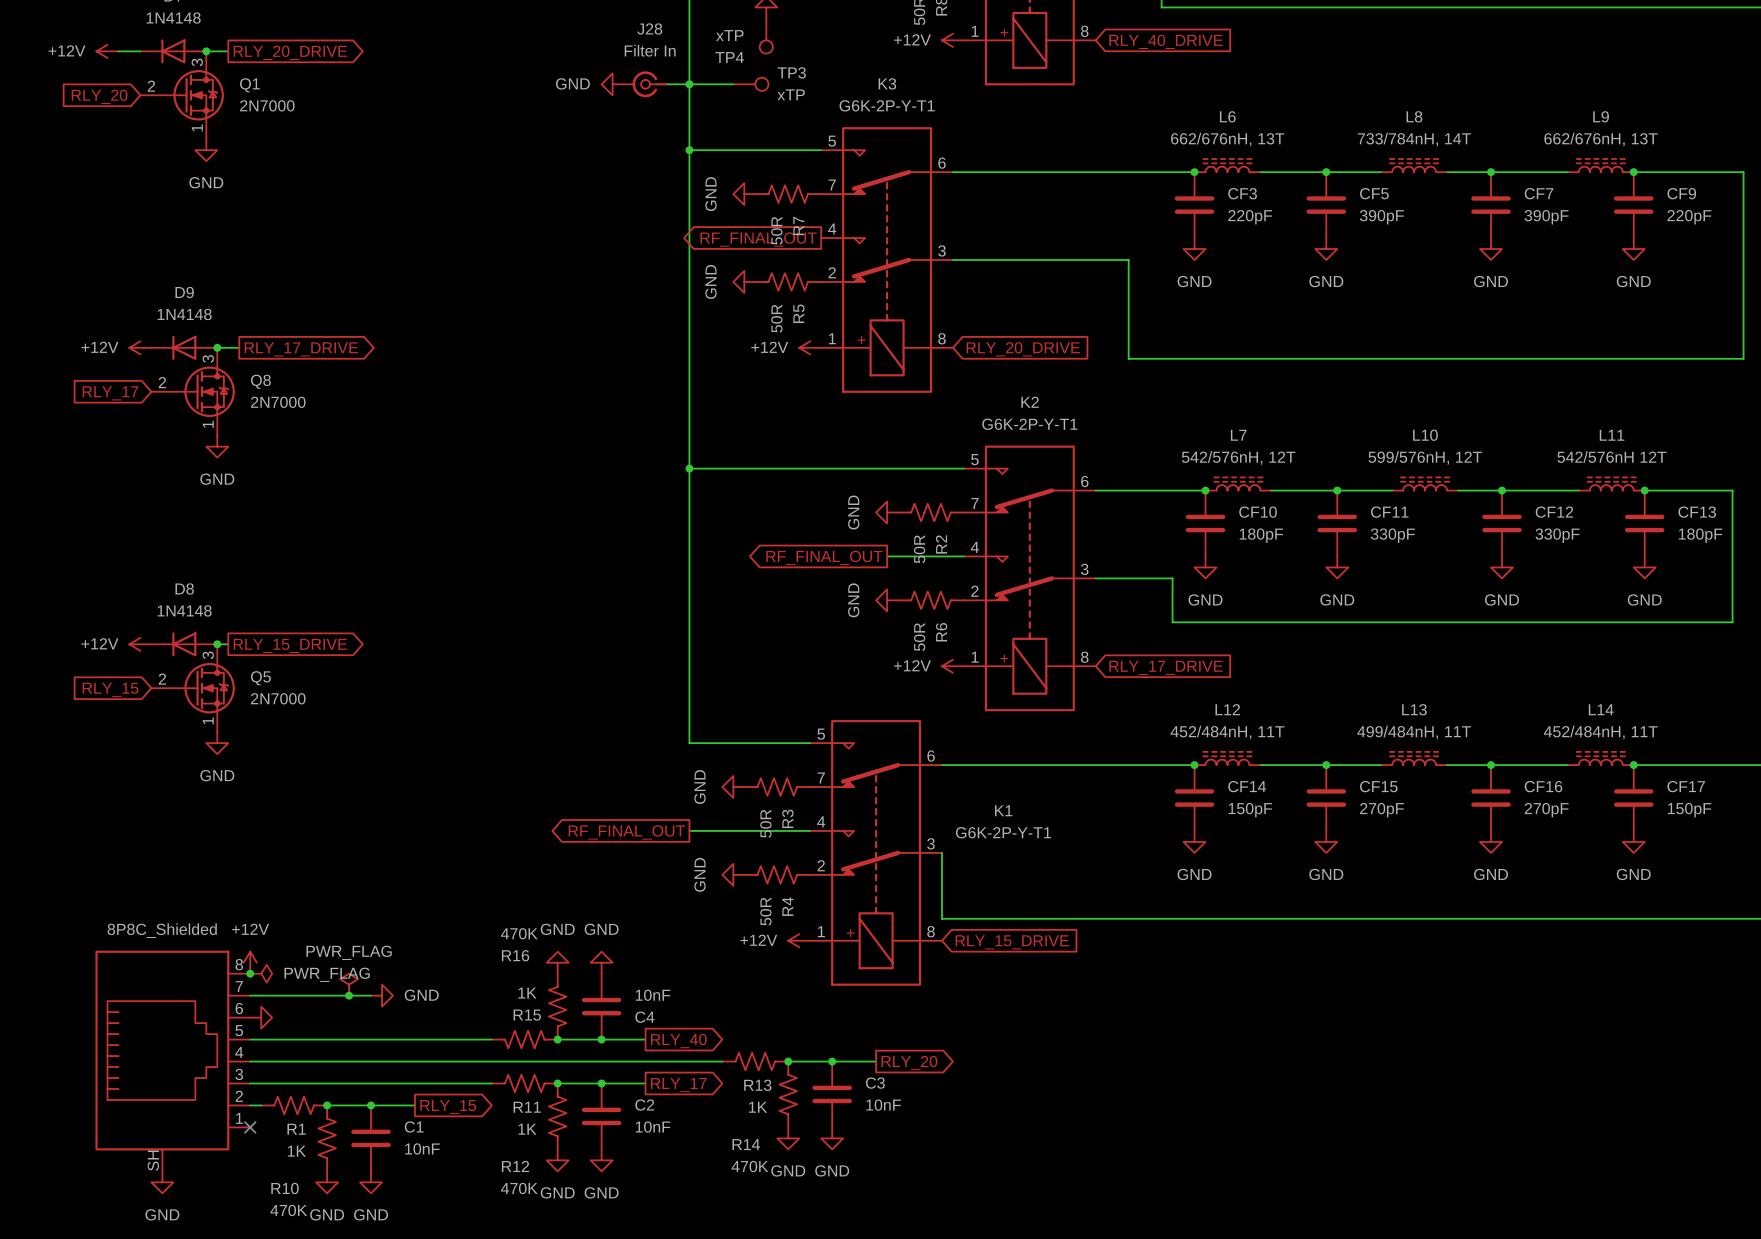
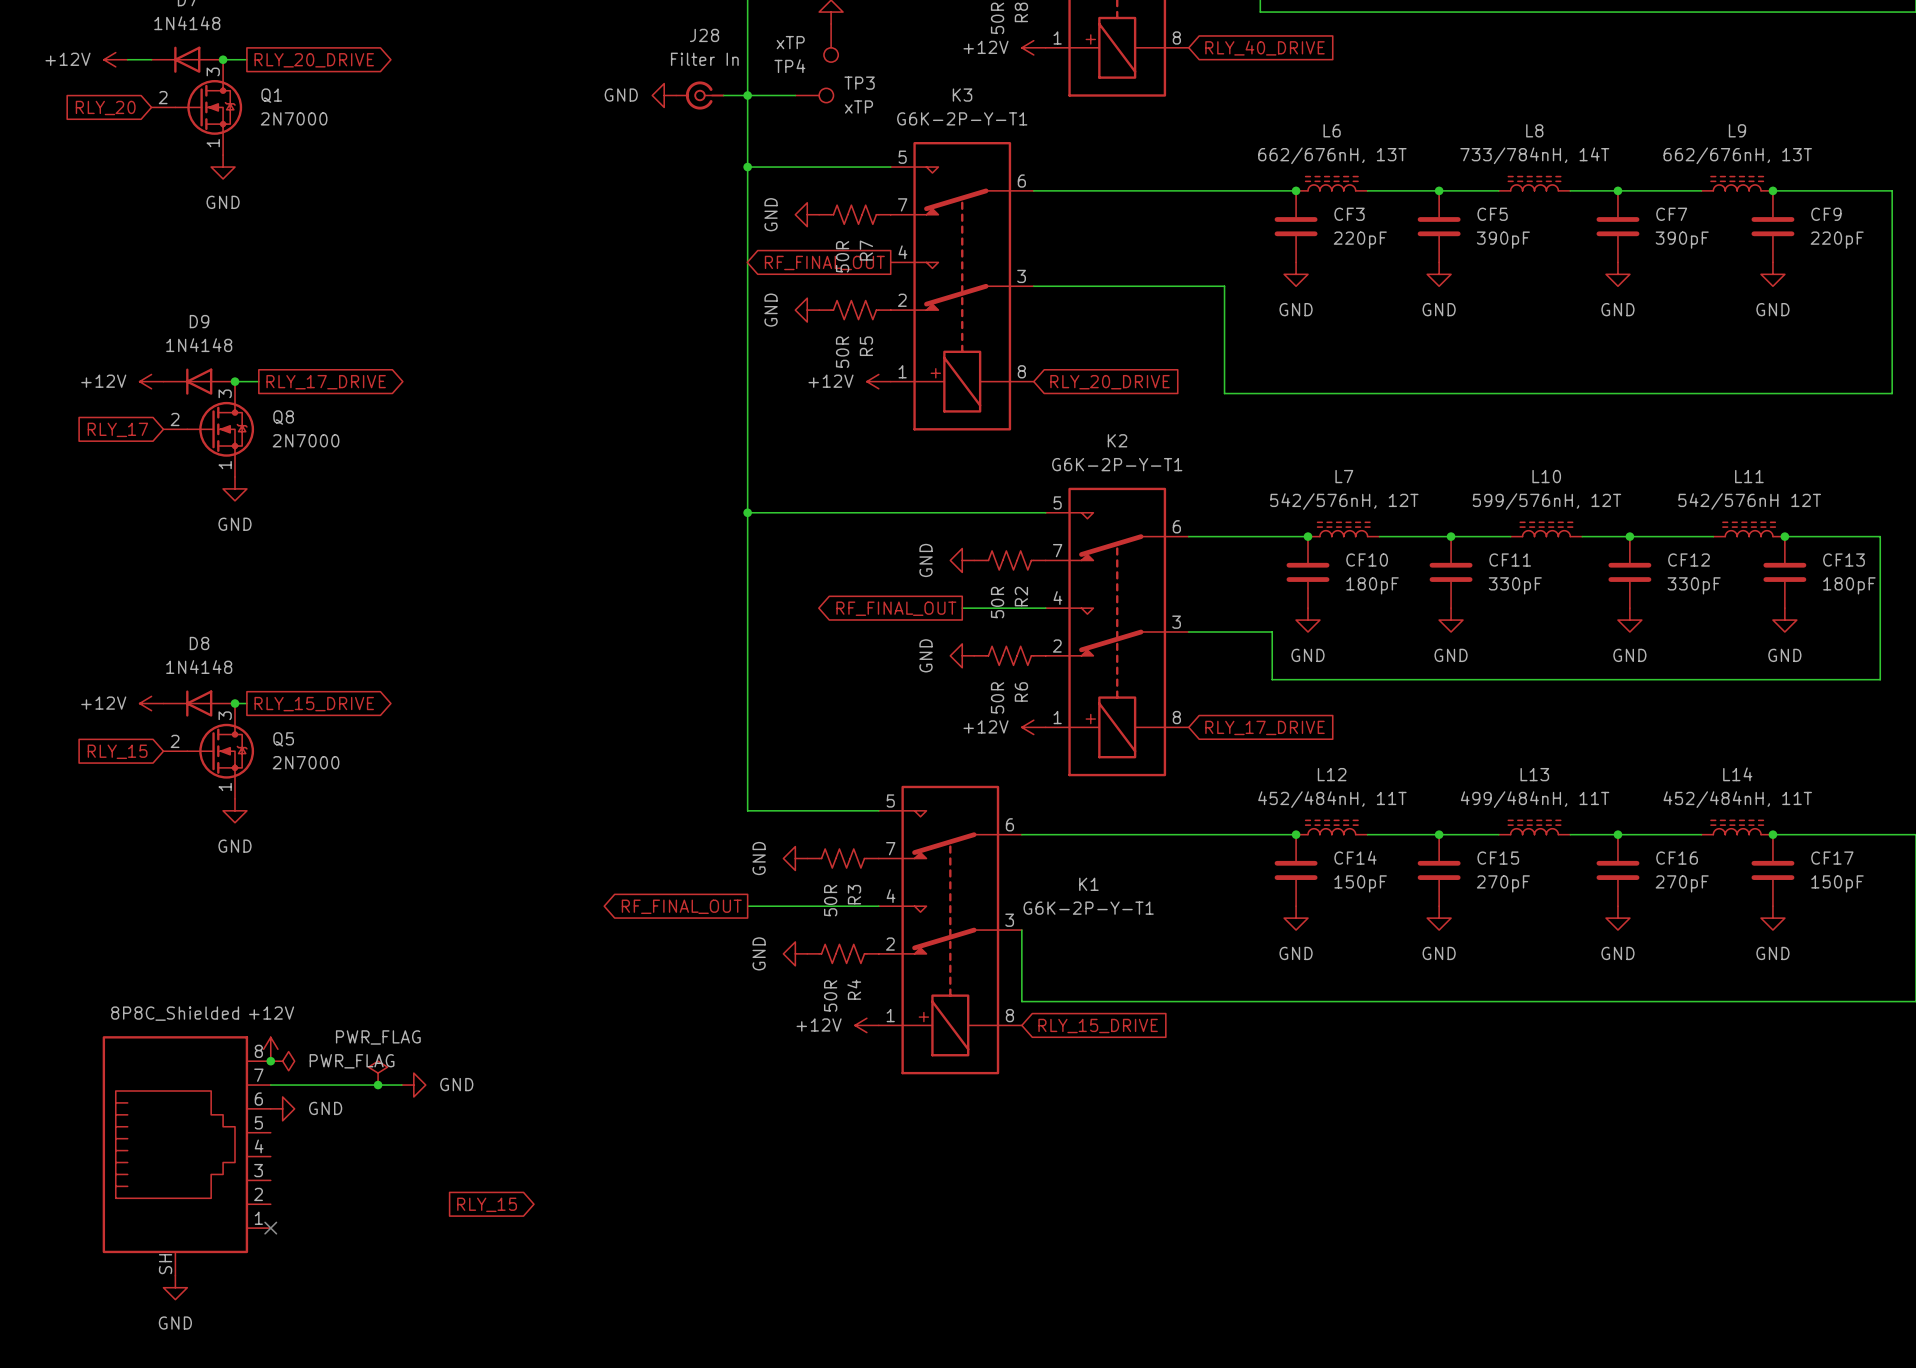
power symbol: GND (557, 962) -> none
power symbol: GND (601, 962) -> none
R16: 470K (557, 1006) -> none
C4: 10nF (601, 1006) -> none
power symbol text: none -> GND (325, 1108)
wire: (250, 1039) (491, 1039) -> none
R15: 1K (524, 1039) -> none
wire: (557, 1039) (645, 1039) -> none
junction: (557, 1039) -> none
junction: (601, 1039) -> none
global label: RLY_40 (678, 1041) -> none
wire: (250, 1061) (722, 1061) -> none
R13: 1K (755, 1061) -> none
wire: (788, 1061) (876, 1061) -> none
junction: (788, 1061) -> none
junction: (832, 1061) -> none
global label: RLY_20 (909, 1063) -> none
wire: (250, 1083) (491, 1083) -> none
R11: 1K (524, 1083) -> none
wire: (557, 1083) (645, 1083) -> none
junction: (557, 1083) -> none
junction: (601, 1083) -> none
global label: RLY_17 (678, 1085) -> none
R14: 470K (788, 1094) -> none
C3: 10nF (832, 1094) -> none
wire: (250, 1105) (261, 1105) -> none
R1: 1K (294, 1105) -> none
wire: (327, 1105) (414, 1105) -> none
junction: (327, 1105) -> none
junction: (371, 1105) -> none
R12: 470K (557, 1116) -> none
C2: 10nF (601, 1116) -> none
R10: 470K (327, 1138) -> none
C1: 10nF (371, 1138) -> none
power symbol: GND (788, 1138) -> none
power symbol: GND (832, 1138) -> none
power symbol: GND (557, 1160) -> none
power symbol: GND (601, 1160) -> none
power symbol: GND (327, 1182) -> none
power symbol: GND (371, 1182) -> none

